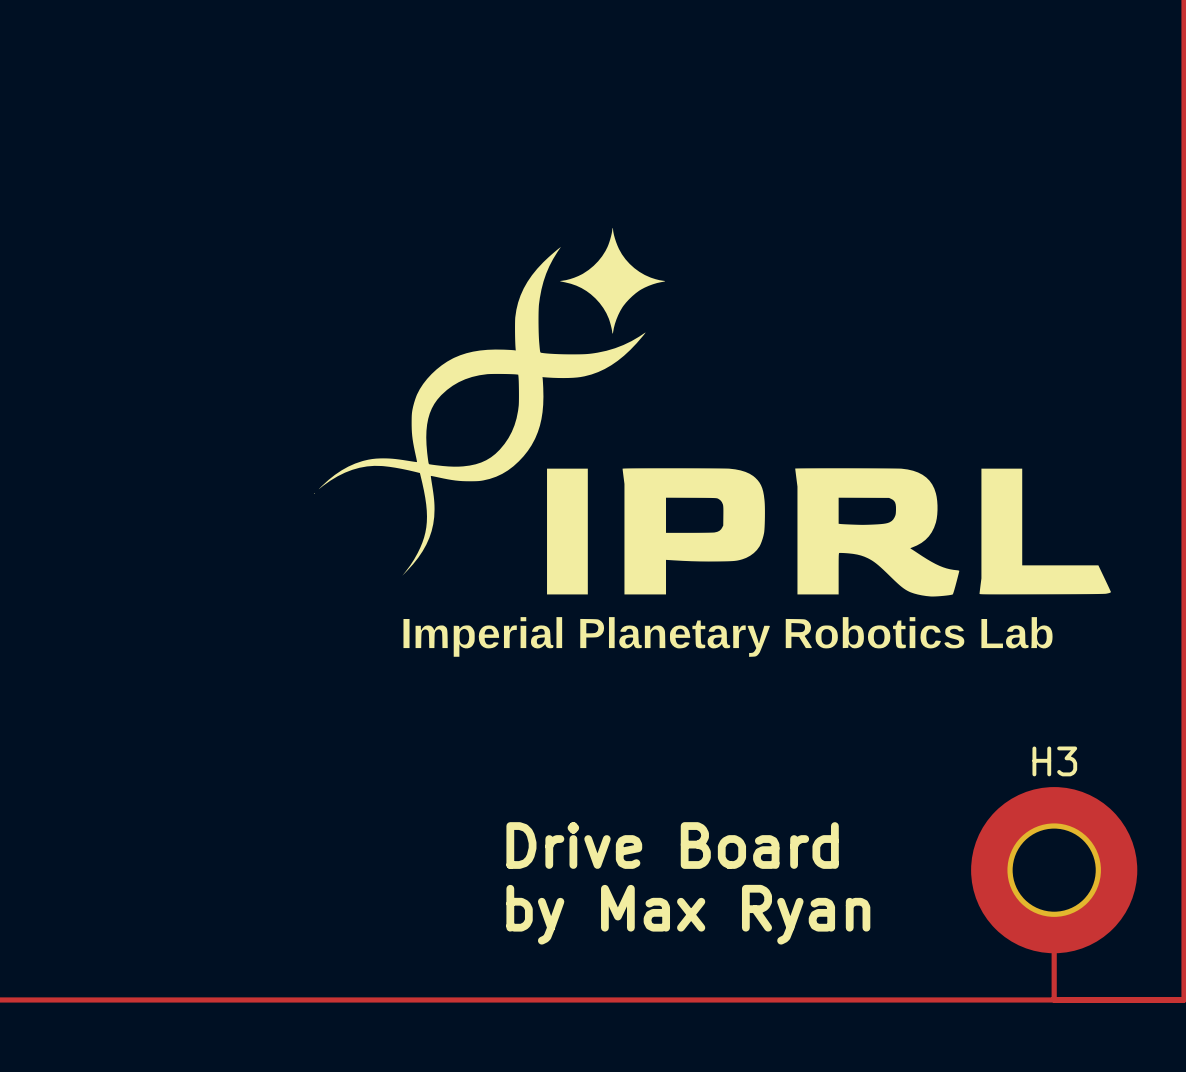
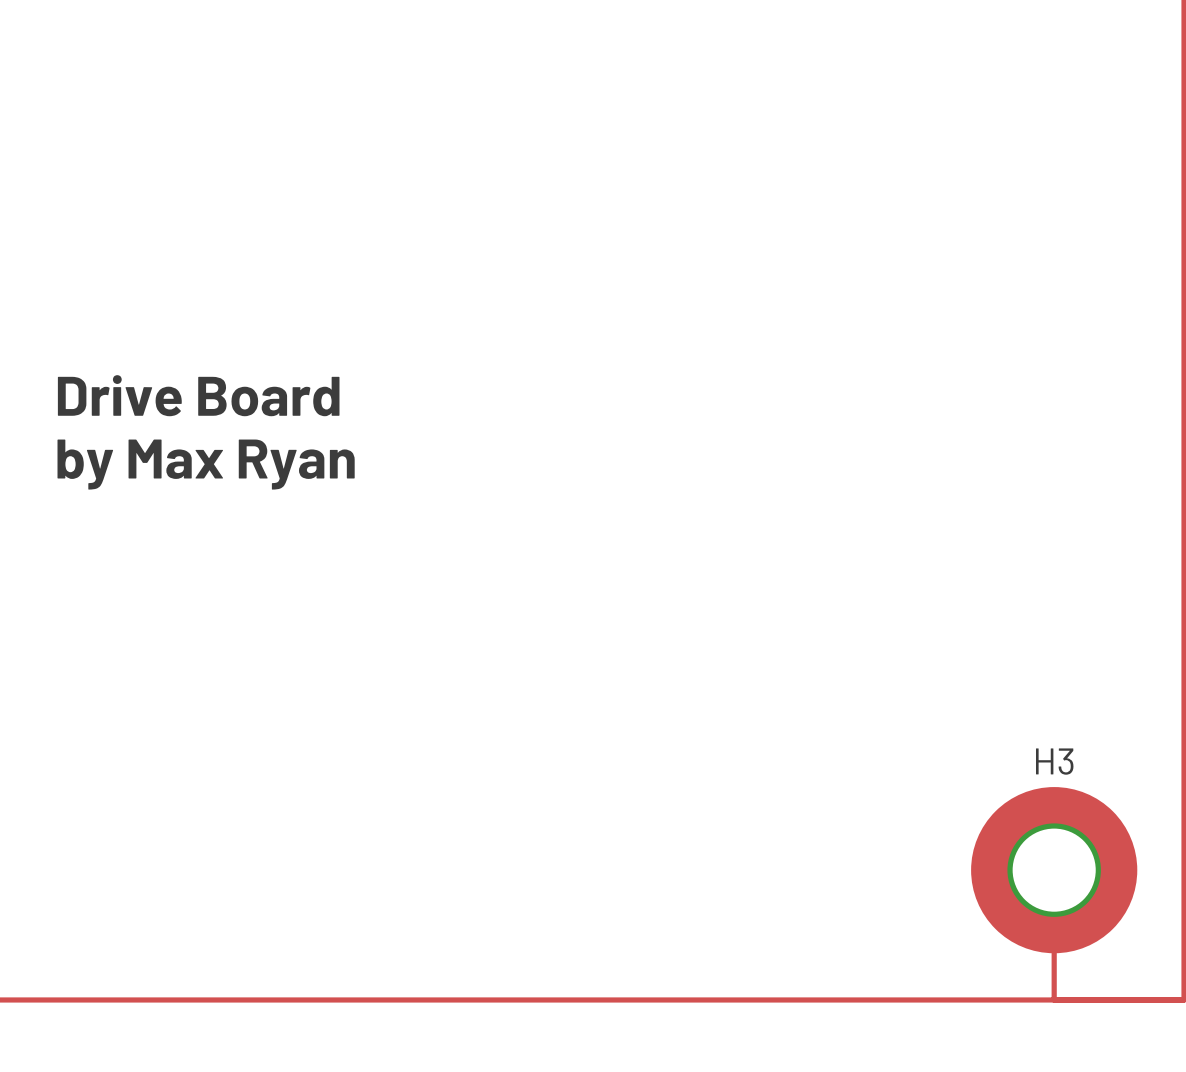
drawing: [313, 228, 1111, 657] -> none
text position: Drive Board (672, 845) -> Drive Board (198, 395)
text position: by Max Ryan (688, 914) -> by Max Ryan (206, 464)

